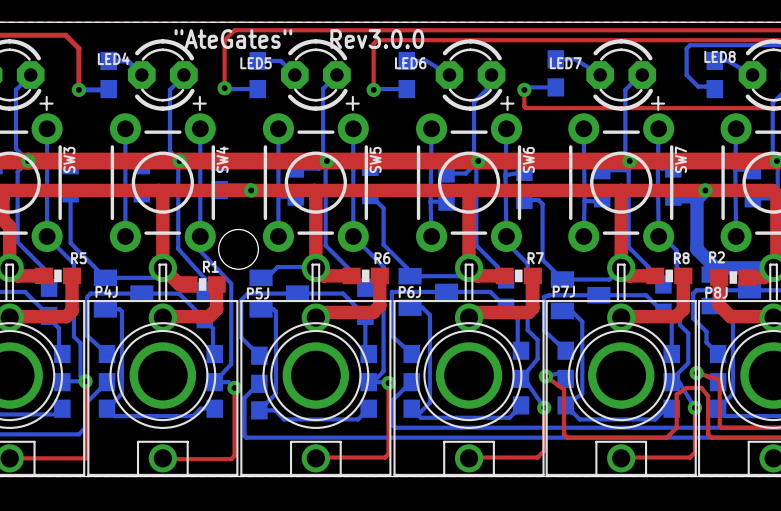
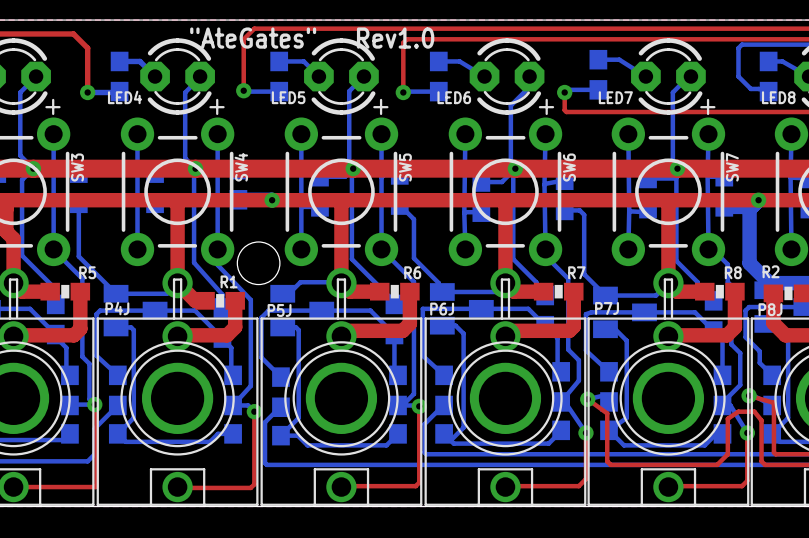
text: "AteGates" Rev3.0.0 (299, 39) -> "AteGates" Rev1.0 (312, 38)
LED8 name position: LED8 (720, 56) -> LED8 (778, 97)
LED4 name position: LED4 (113, 58) -> LED4 (125, 97)
LED5 name position: LED5 (256, 63) -> LED5 (288, 97)
LED6 name position: LED6 (410, 63) -> LED6 (454, 97)
LED7 name position: LED7 (565, 63) -> LED7 (615, 97)

